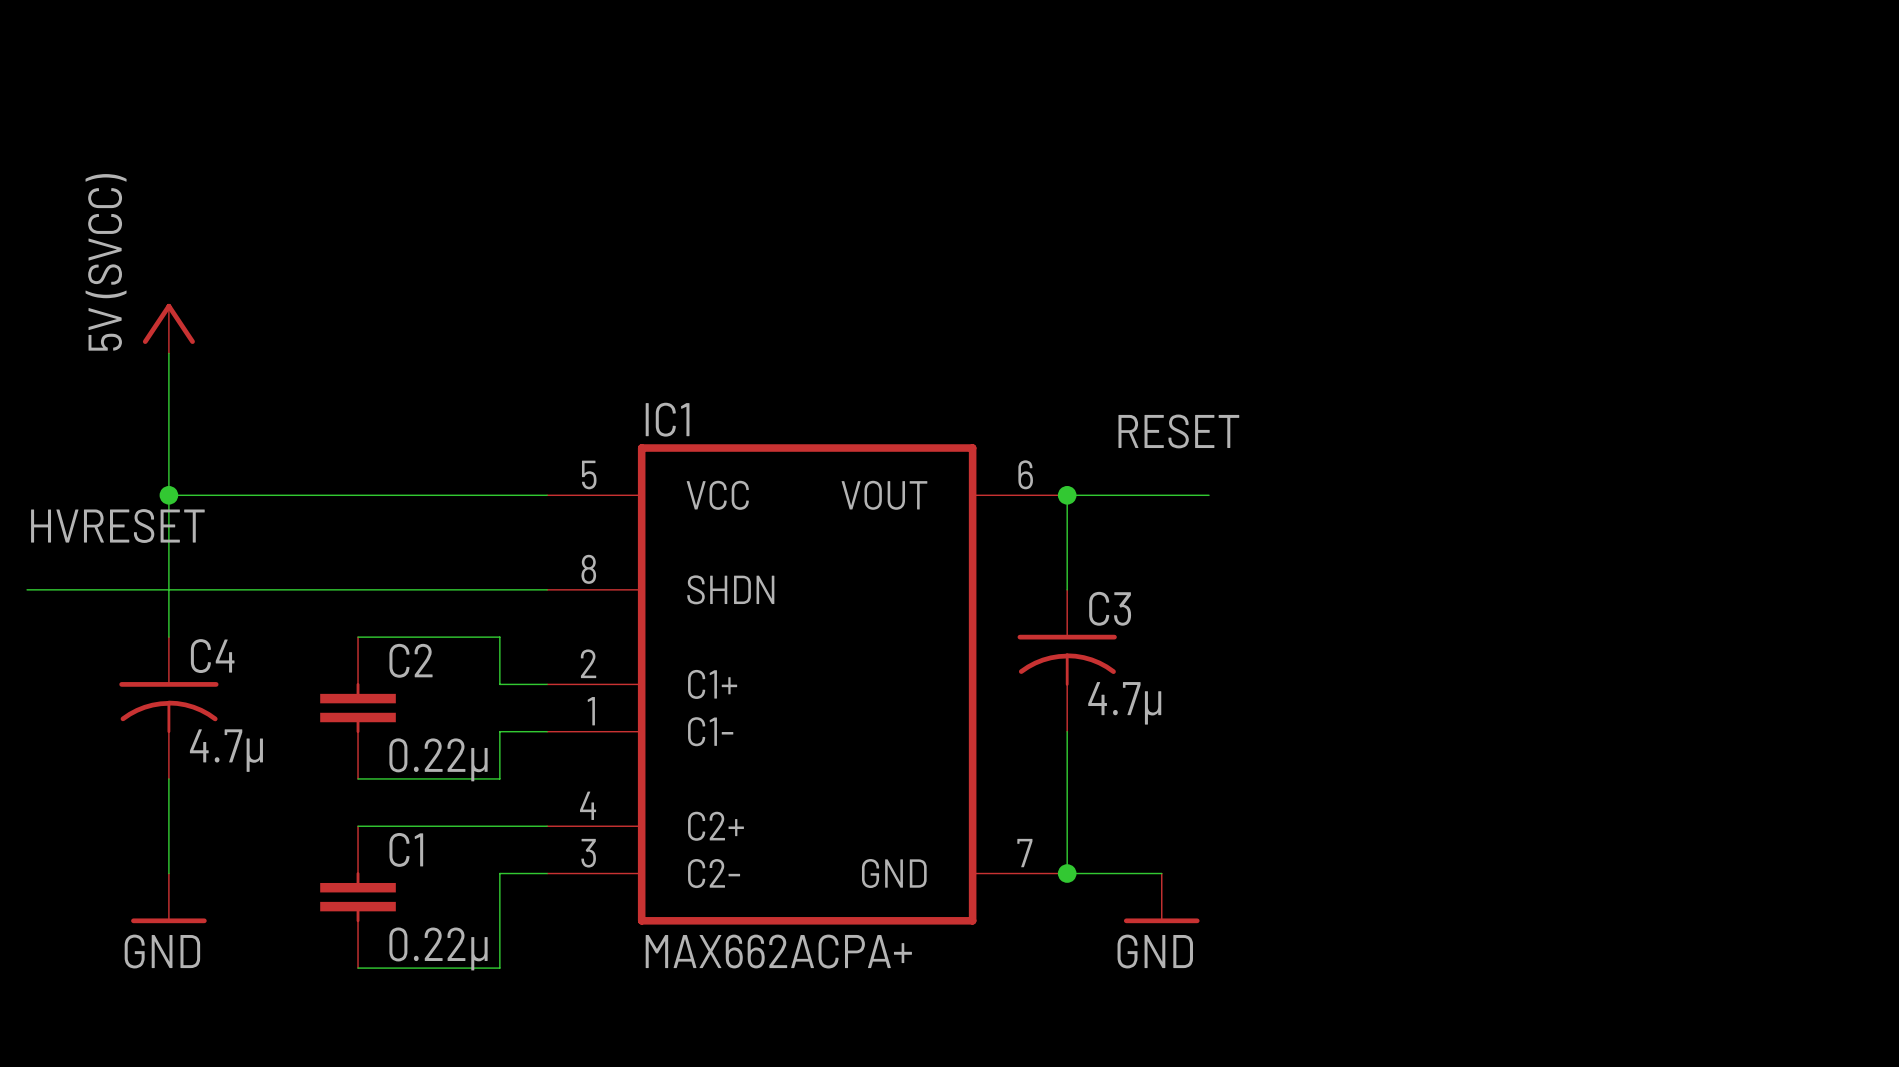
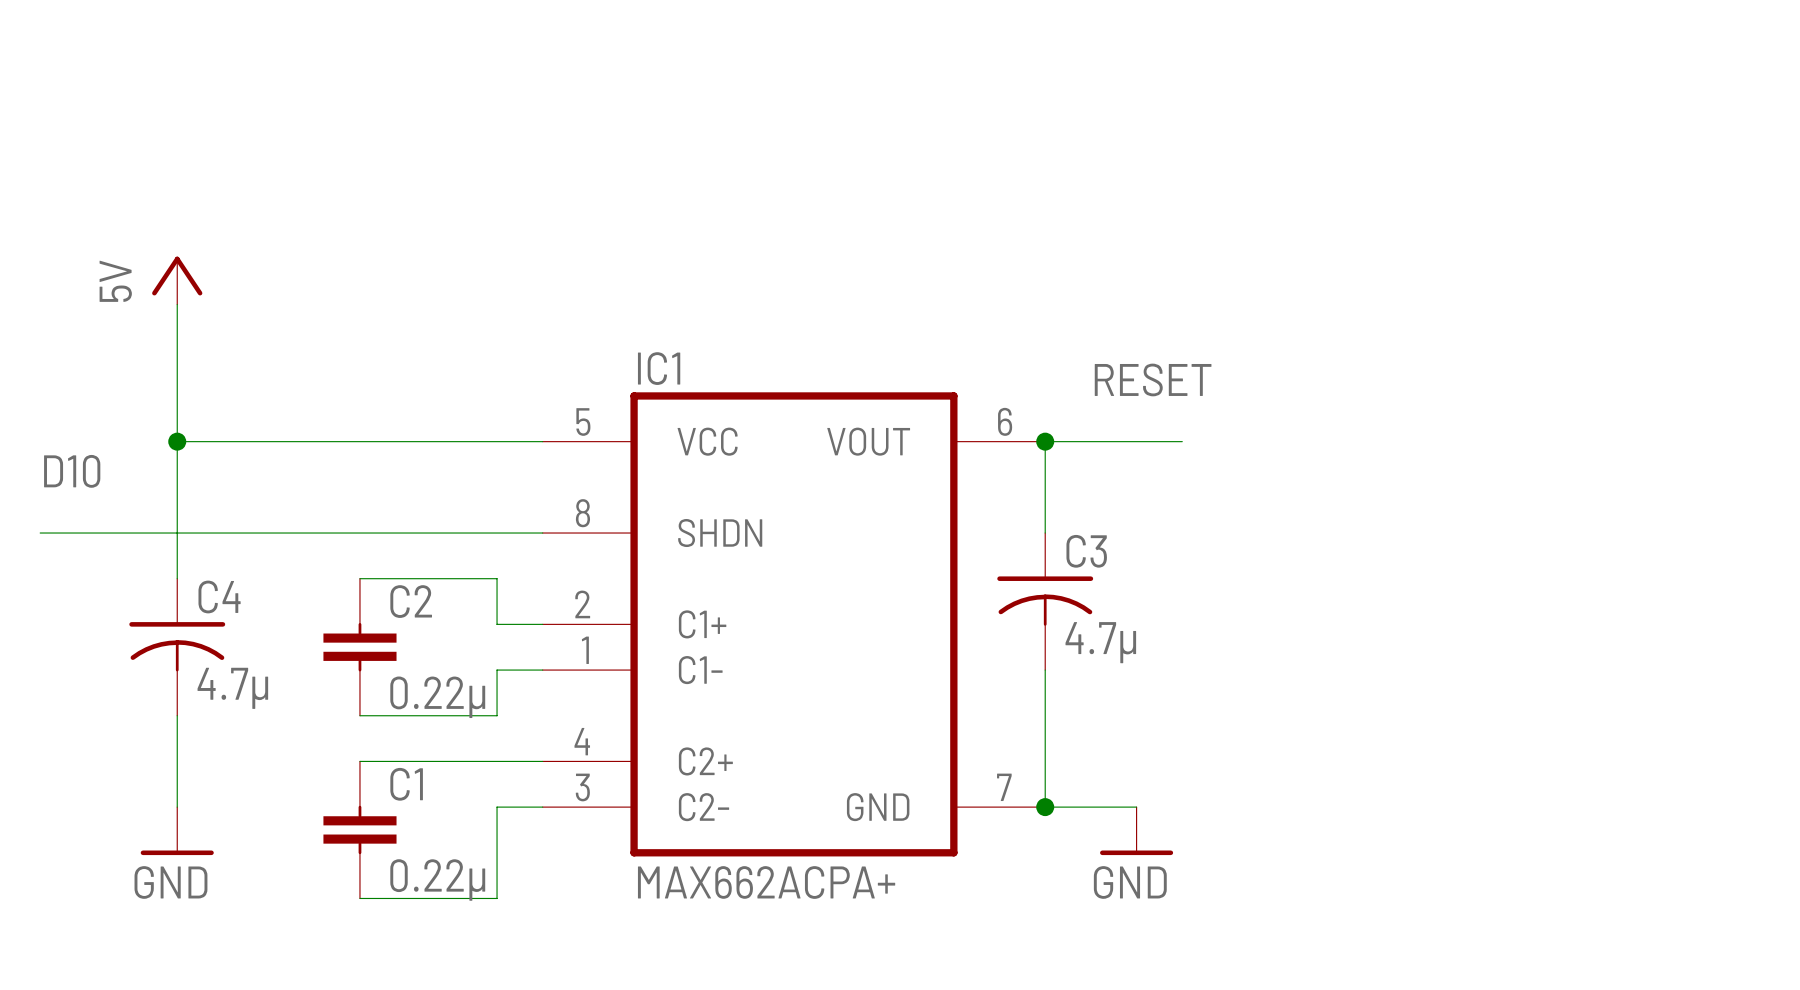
power symbol: 5V (SVCC) (168, 328) -> 5V (177, 280)
label: HVRESET (117, 526) -> D10 (72, 471)

